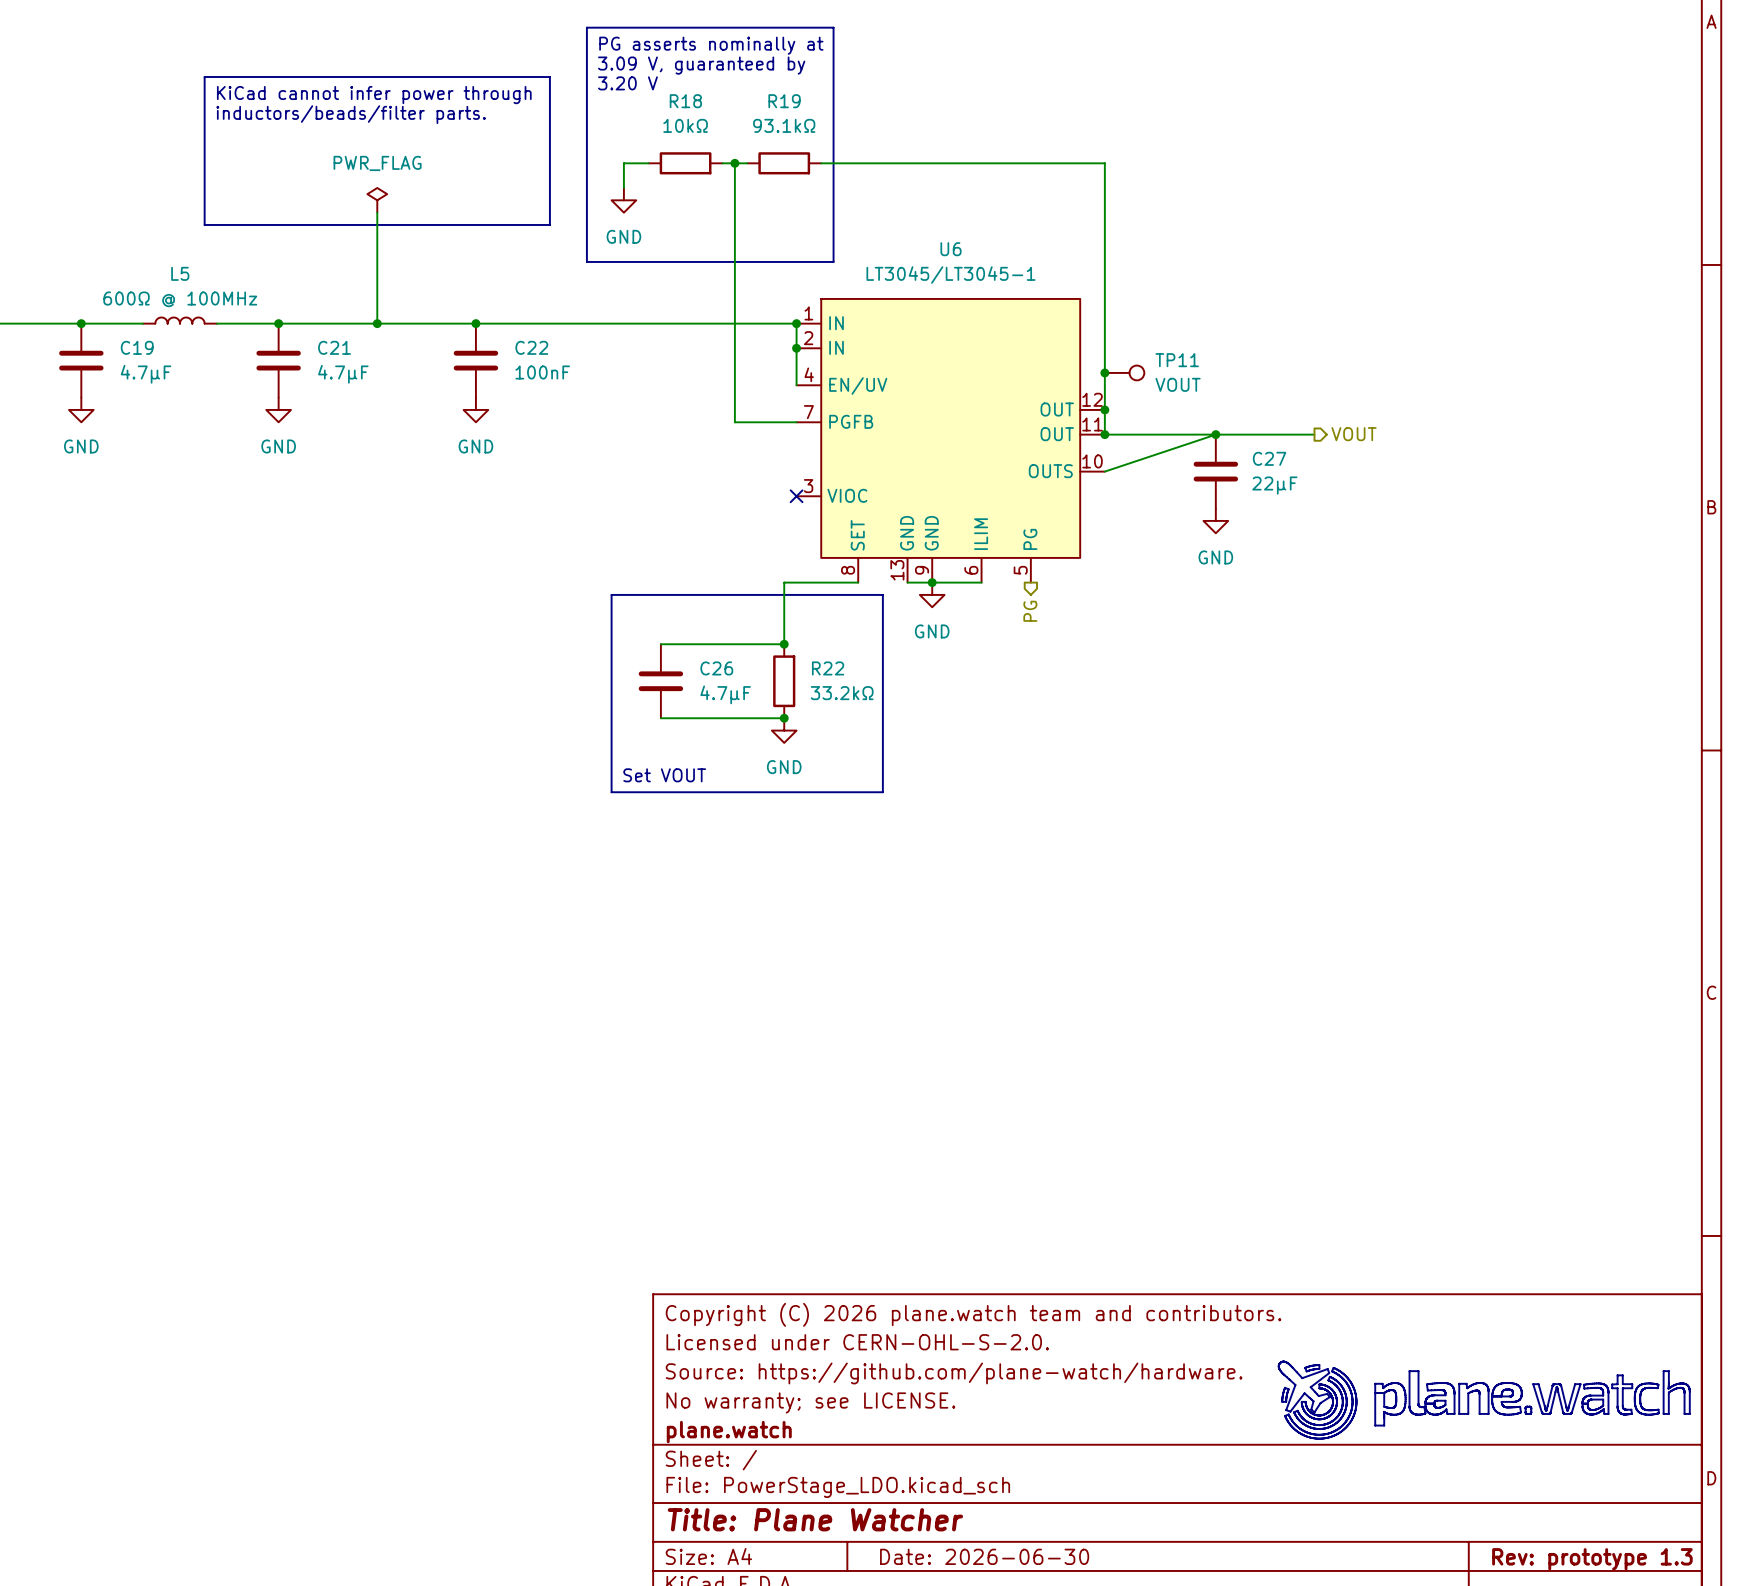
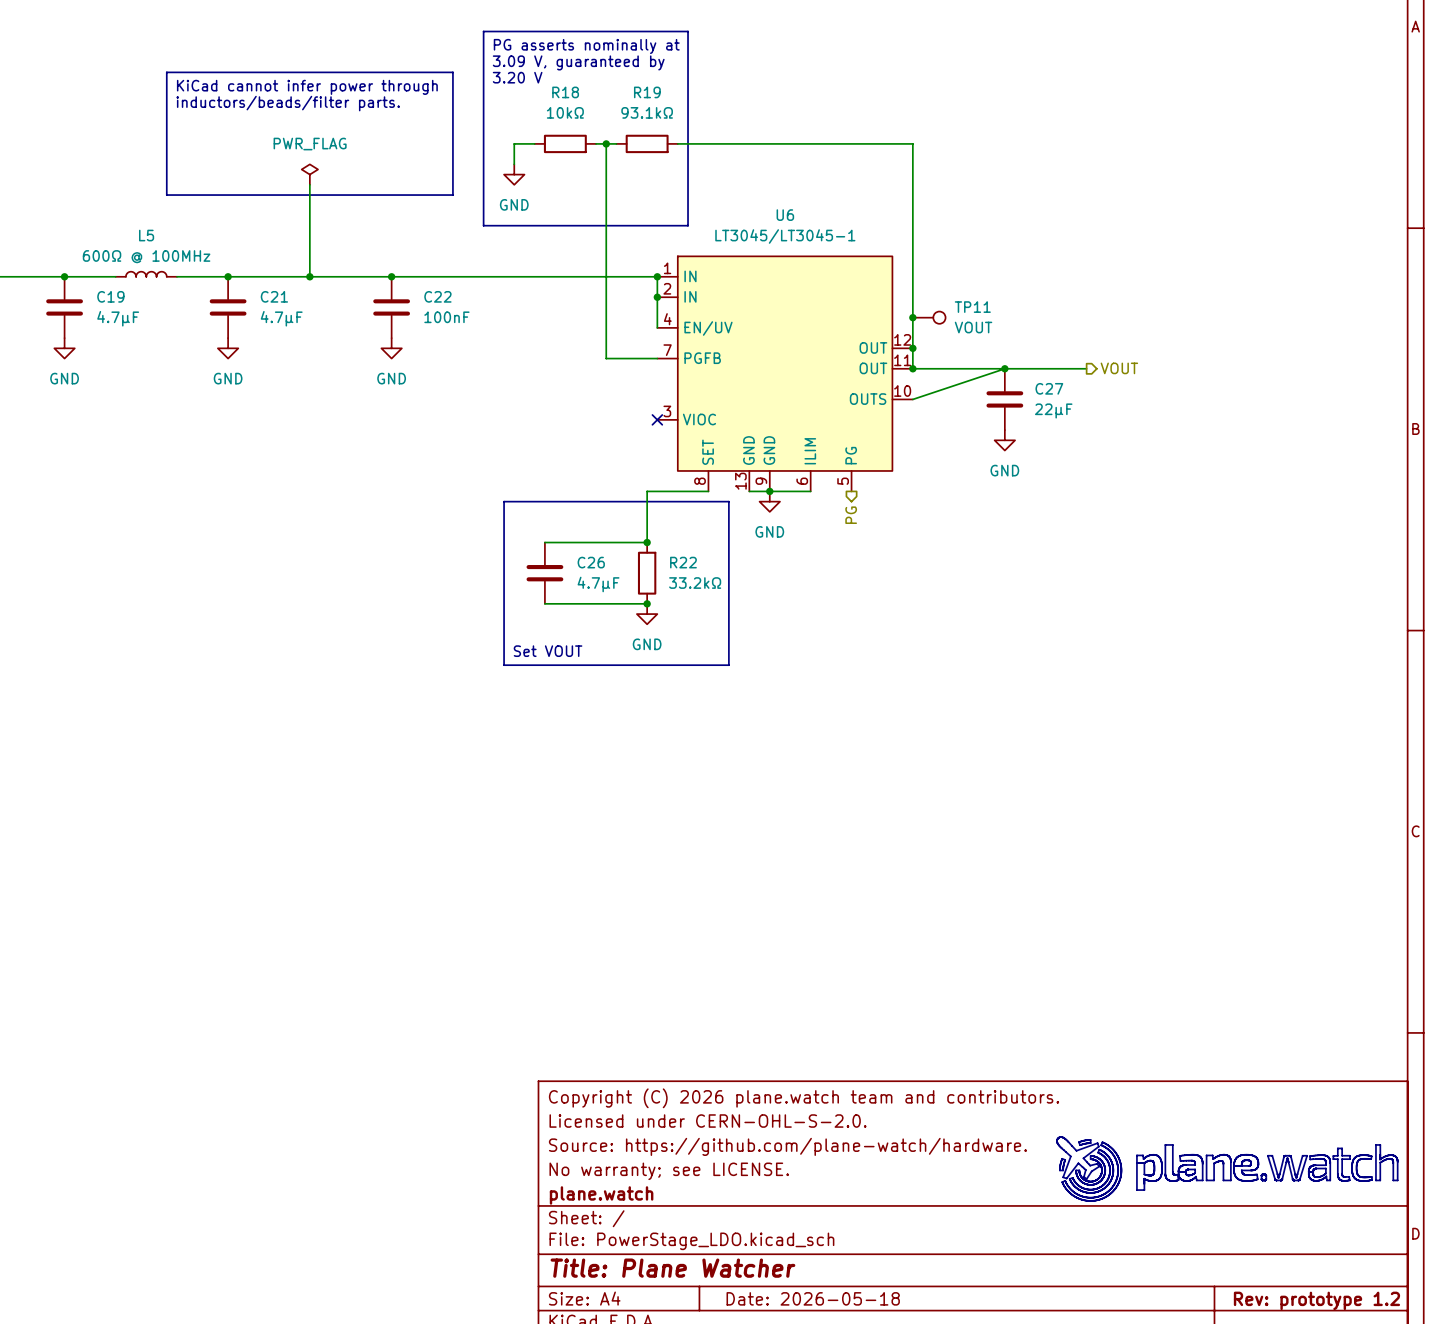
title block: Date: 2026-06-30 (984, 1556) -> Date: 2026-05-18 (813, 1298)
title block: Rev: prototype 1.3 (1592, 1559) -> Rev: prototype 1.2 (1316, 1300)

